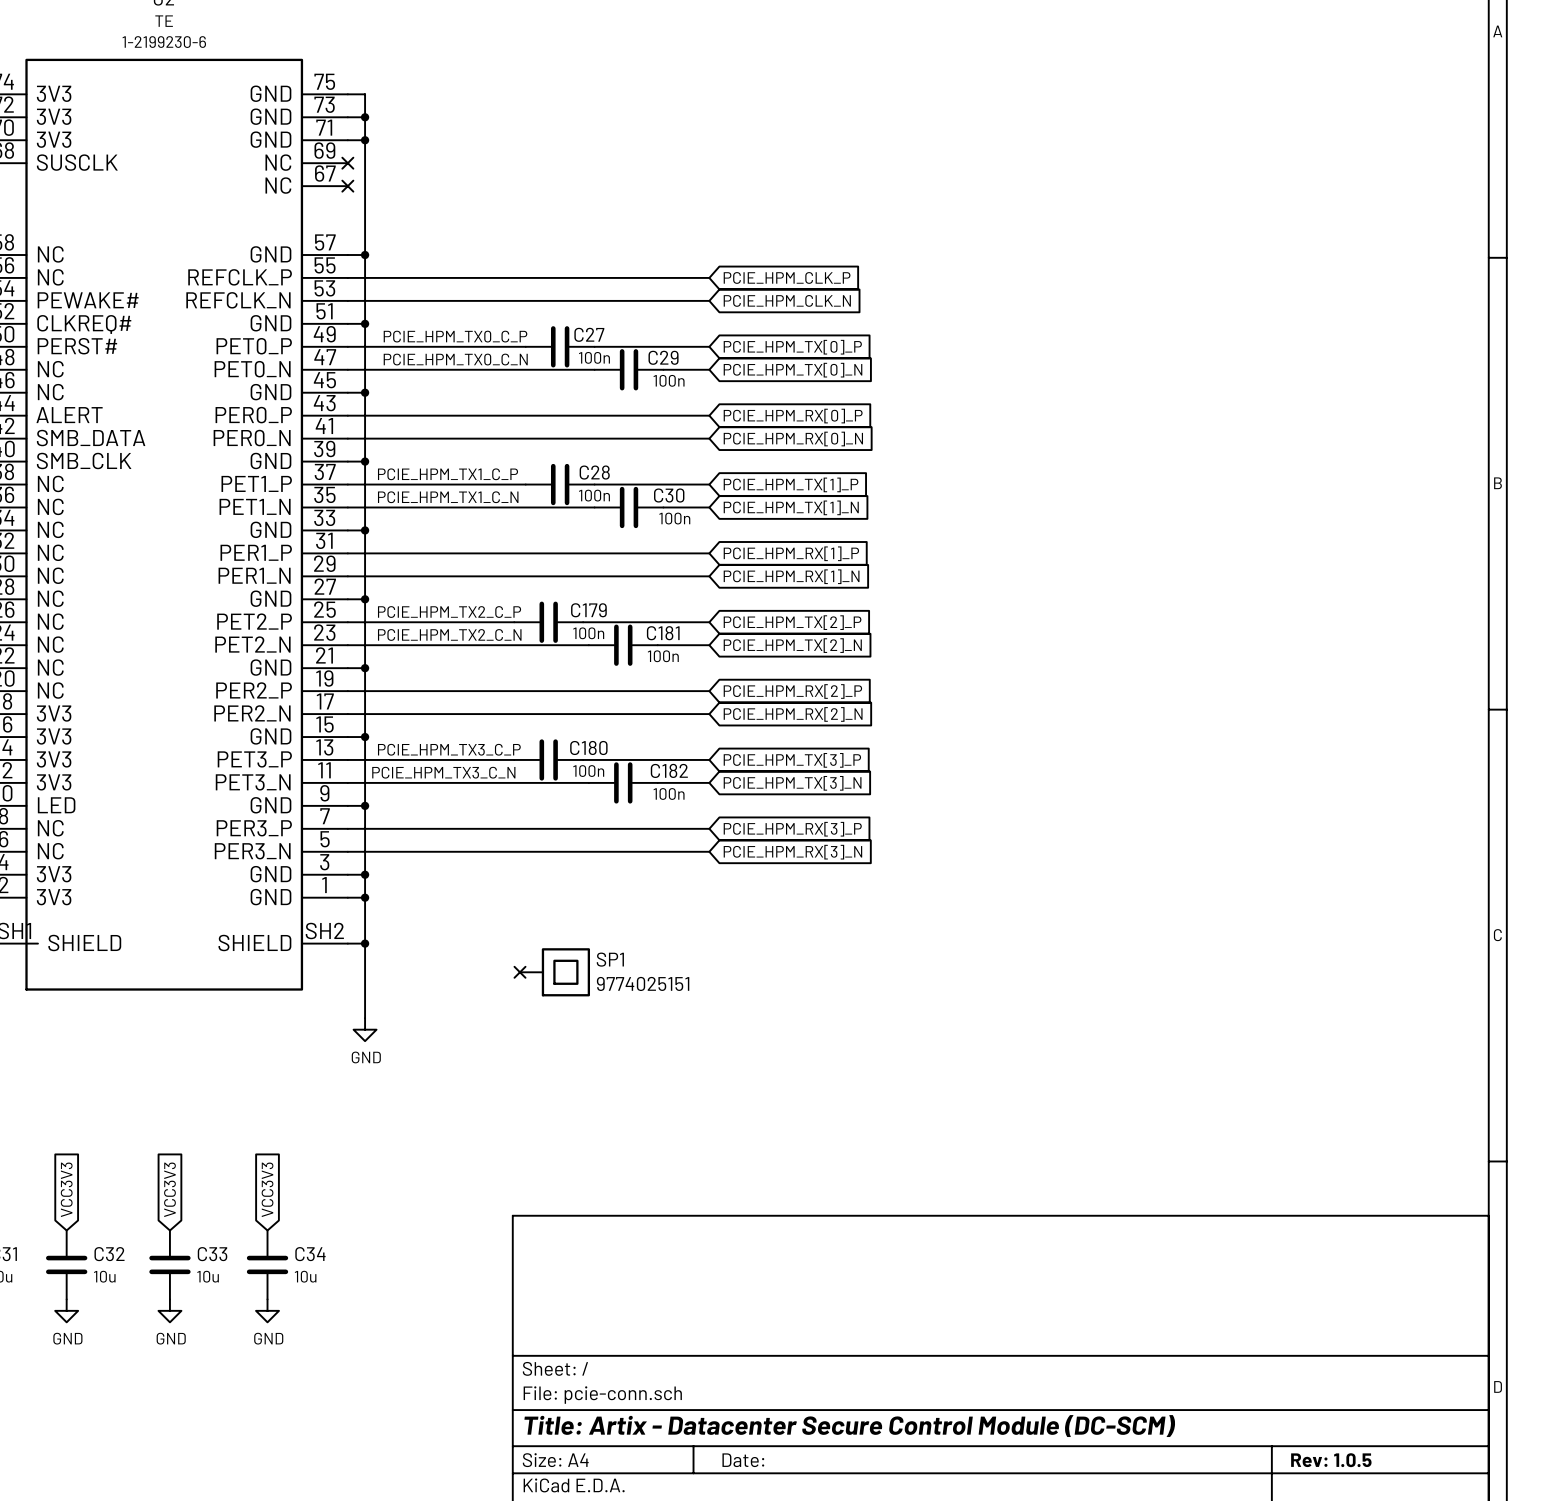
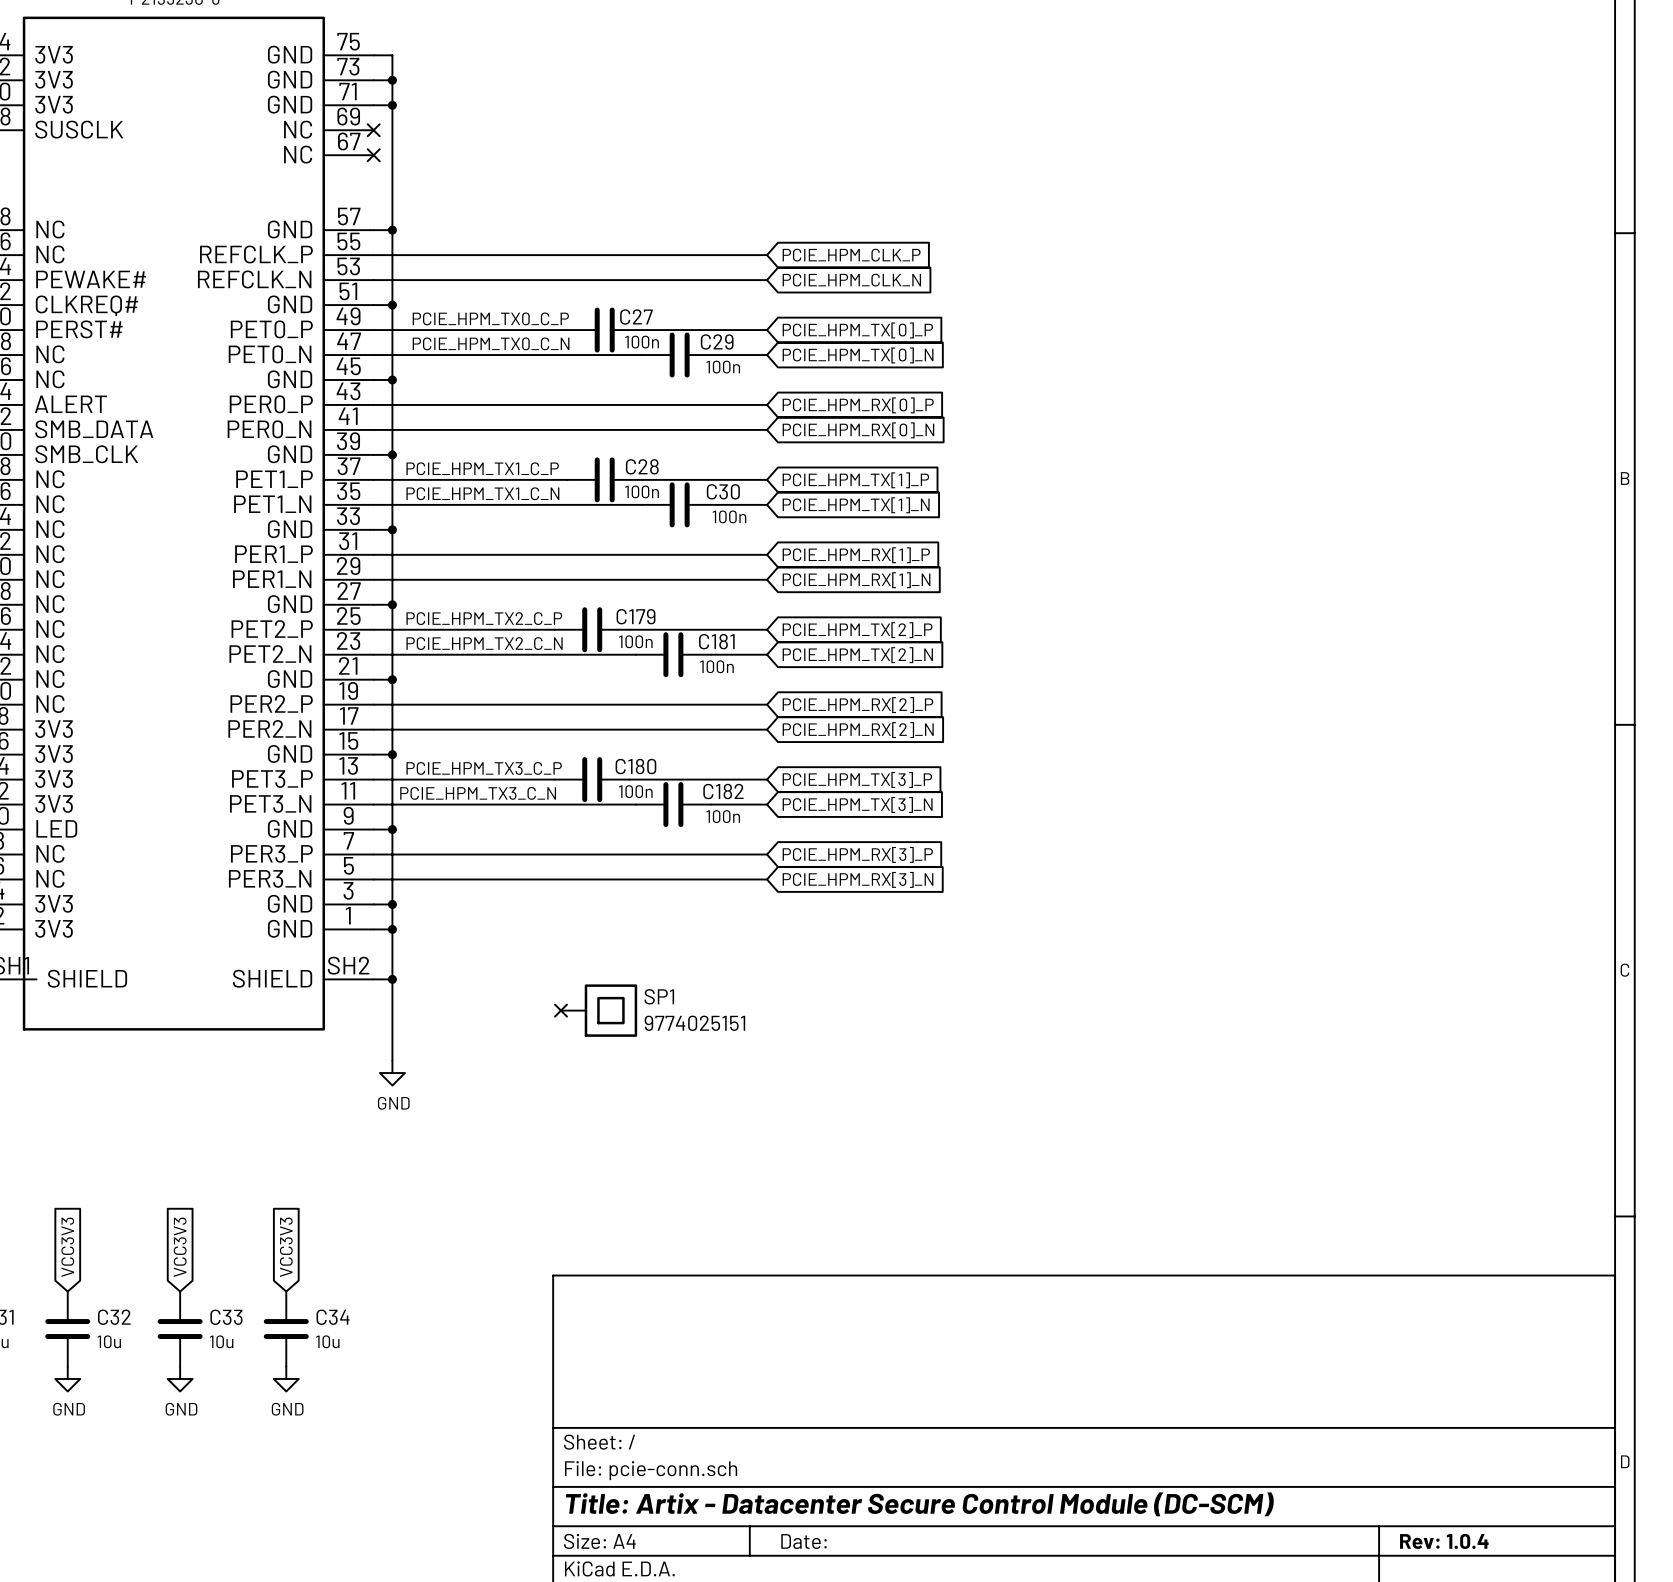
title block: Rev: 1.0.5 (1331, 1460) -> Rev: 1.0.4 (1444, 1541)

